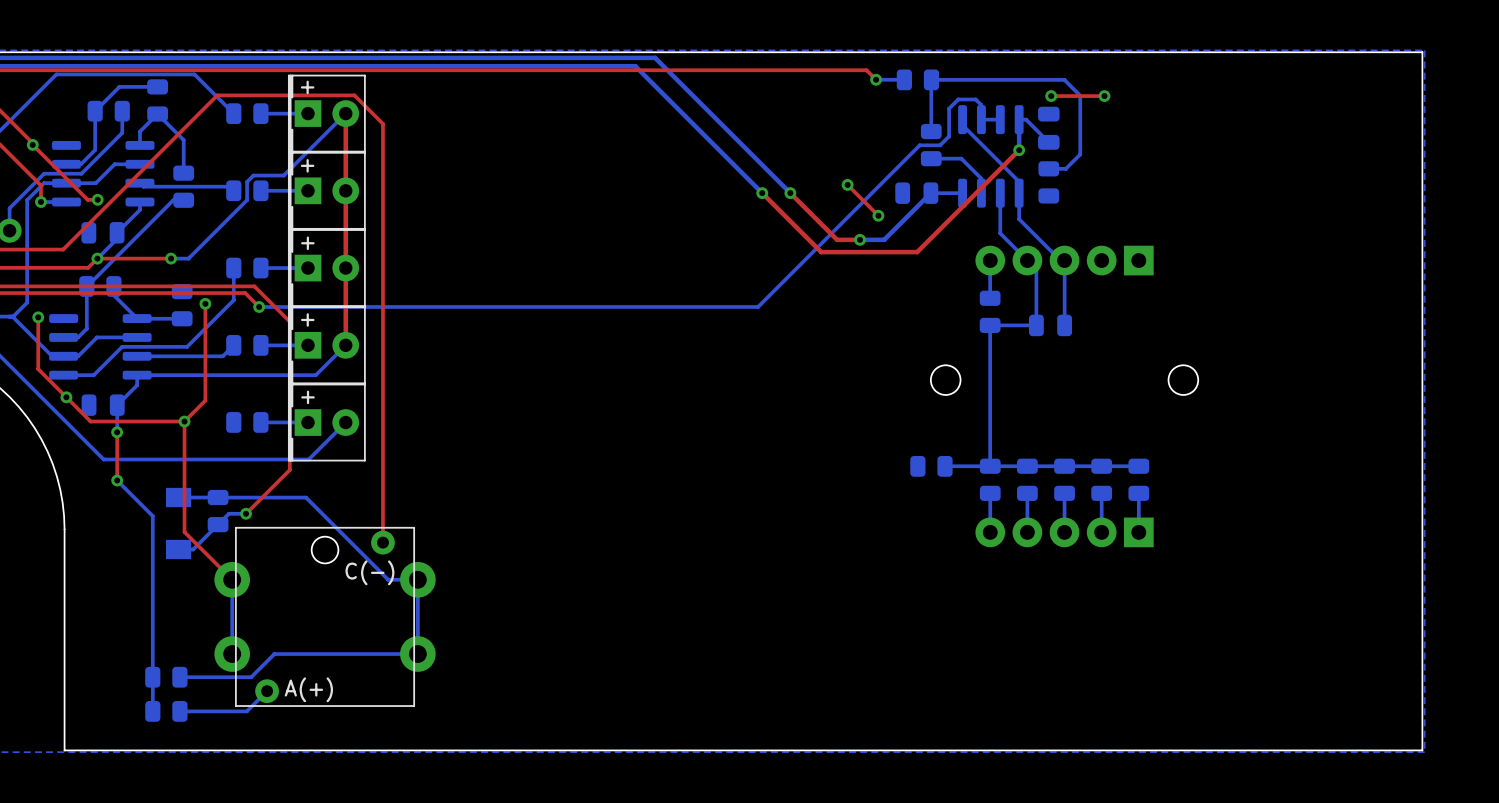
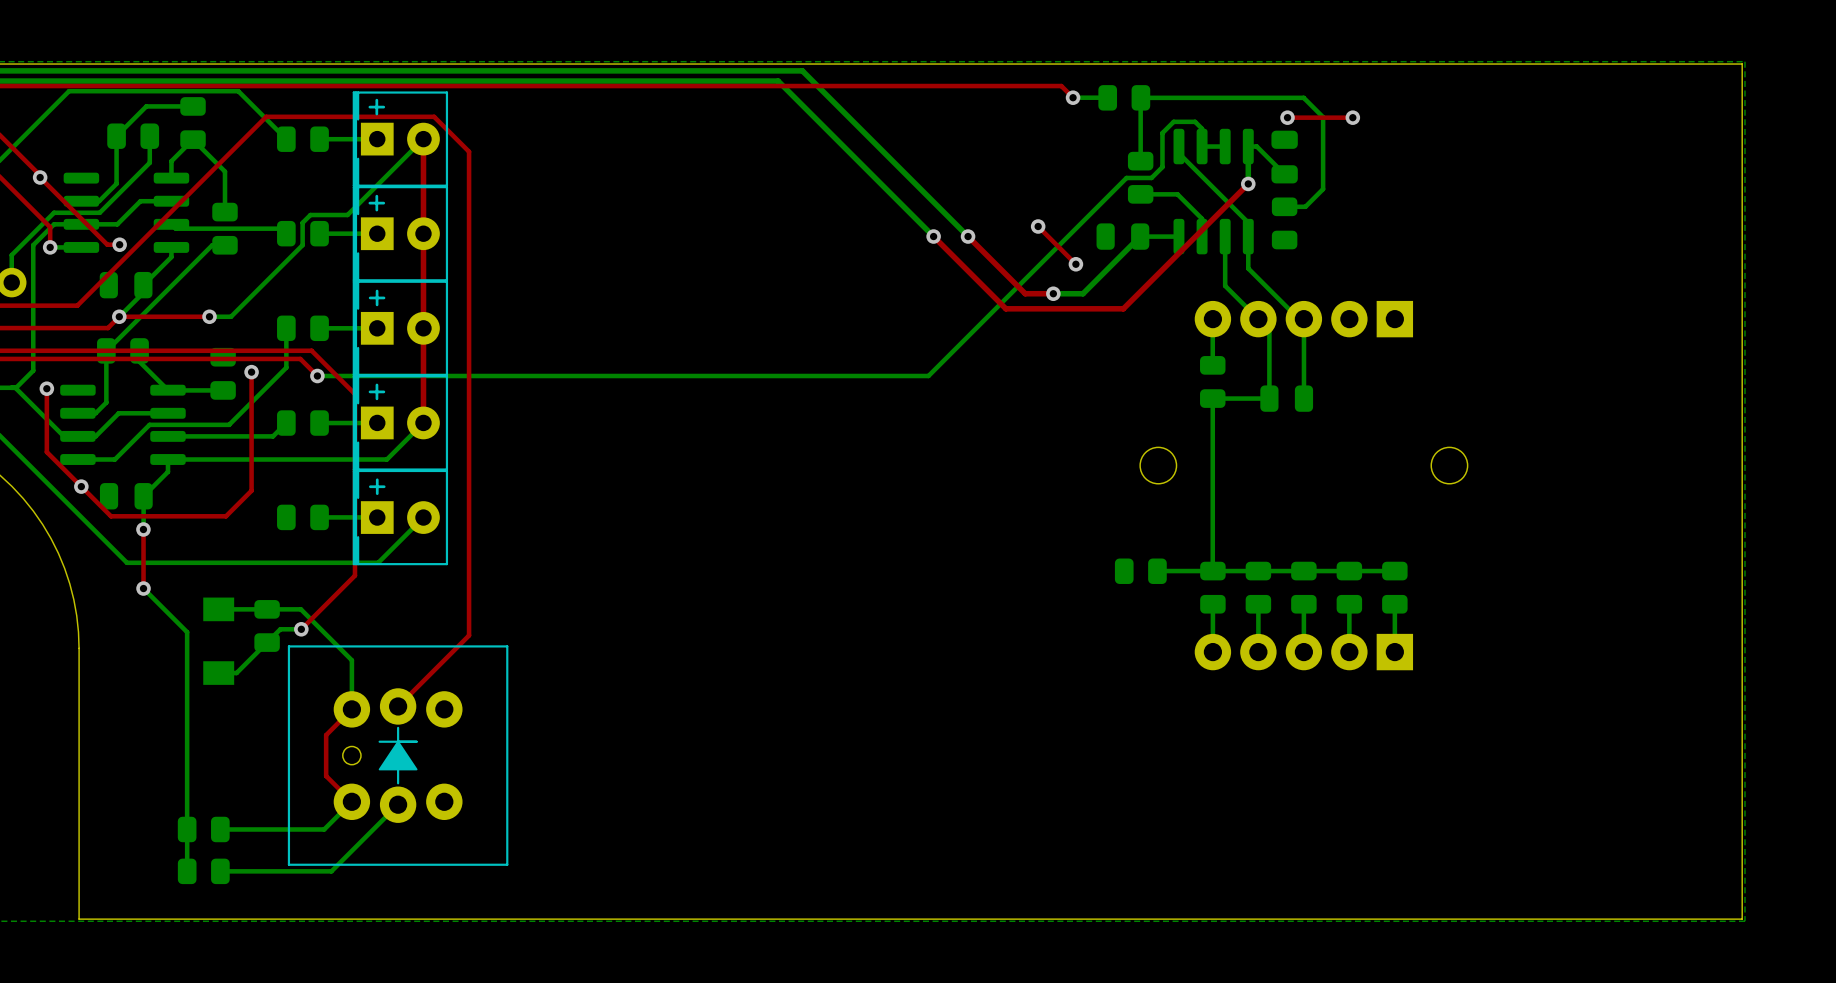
top track: (184, 421) (184, 532) (232, 579) -> none
via: (184, 421) -> none
bottom track: (218, 497) (306, 497) (388, 579) (417, 579) (417, 654) (274, 654) (251, 677) -> (267, 609) (300, 609) (351, 660) (351, 709)
top track: (382, 518) (382, 542) -> (469, 635) (398, 706)
part footprint: [214, 526, 436, 707] -> [287, 645, 509, 866]
bottom track: (232, 579) (232, 654) -> none
top track: none -> (351, 709) (326, 735) (326, 776) (351, 801)
bottom track: none -> (351, 801) (324, 829) (307, 829)
bottom track: (267, 691) (246, 711) -> (398, 804) (331, 871) (302, 871)

